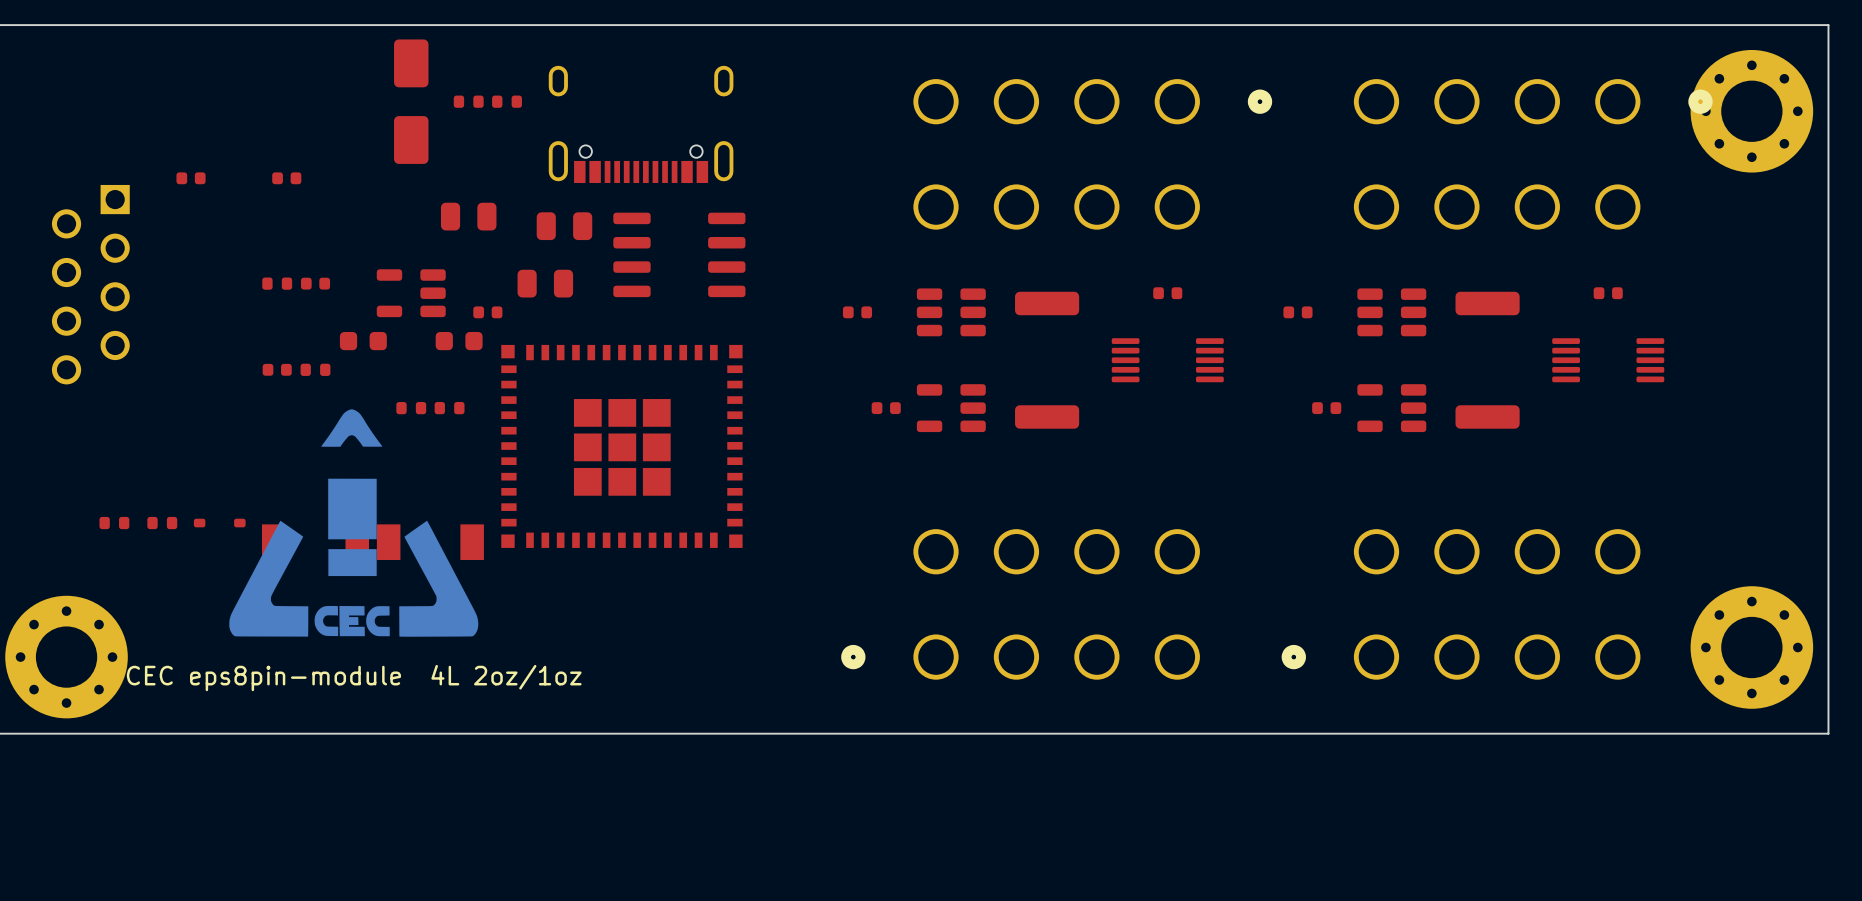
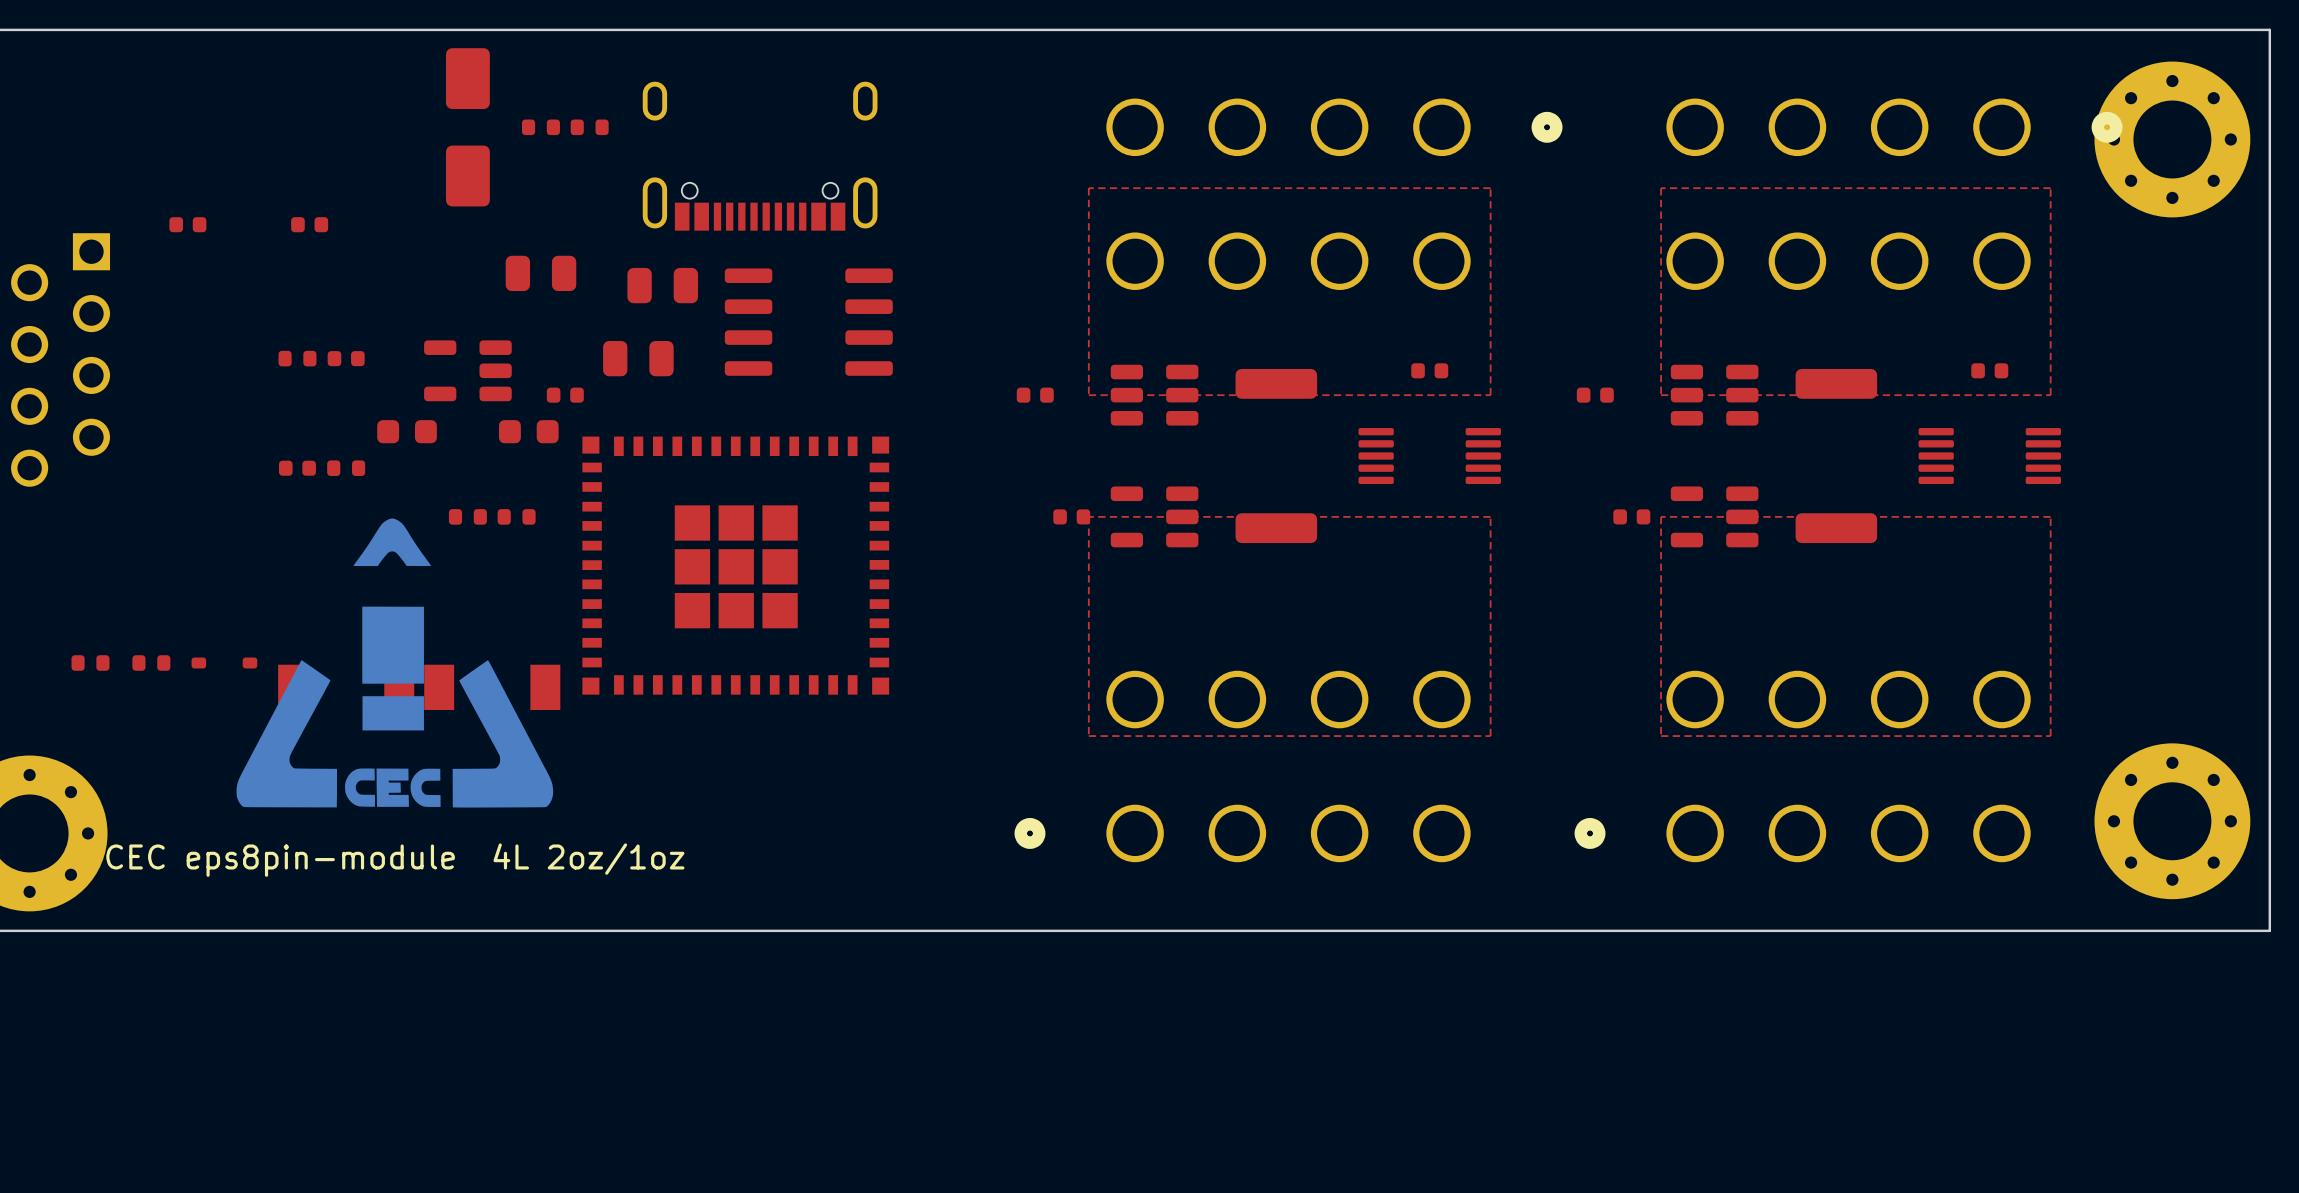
top zone outline: none -> (1490, 188) (1490, 395) (1088, 395) (1088, 188) (1490, 188)
top zone outline: none -> (2050, 188) (2050, 395) (1661, 395) (1661, 188) (2050, 188)
top zone outline: none -> (1490, 516) (1088, 516) (1088, 736) (1490, 736) (1490, 516)
top zone outline: none -> (2050, 516) (1661, 516) (1661, 736) (2050, 736) (2050, 516)

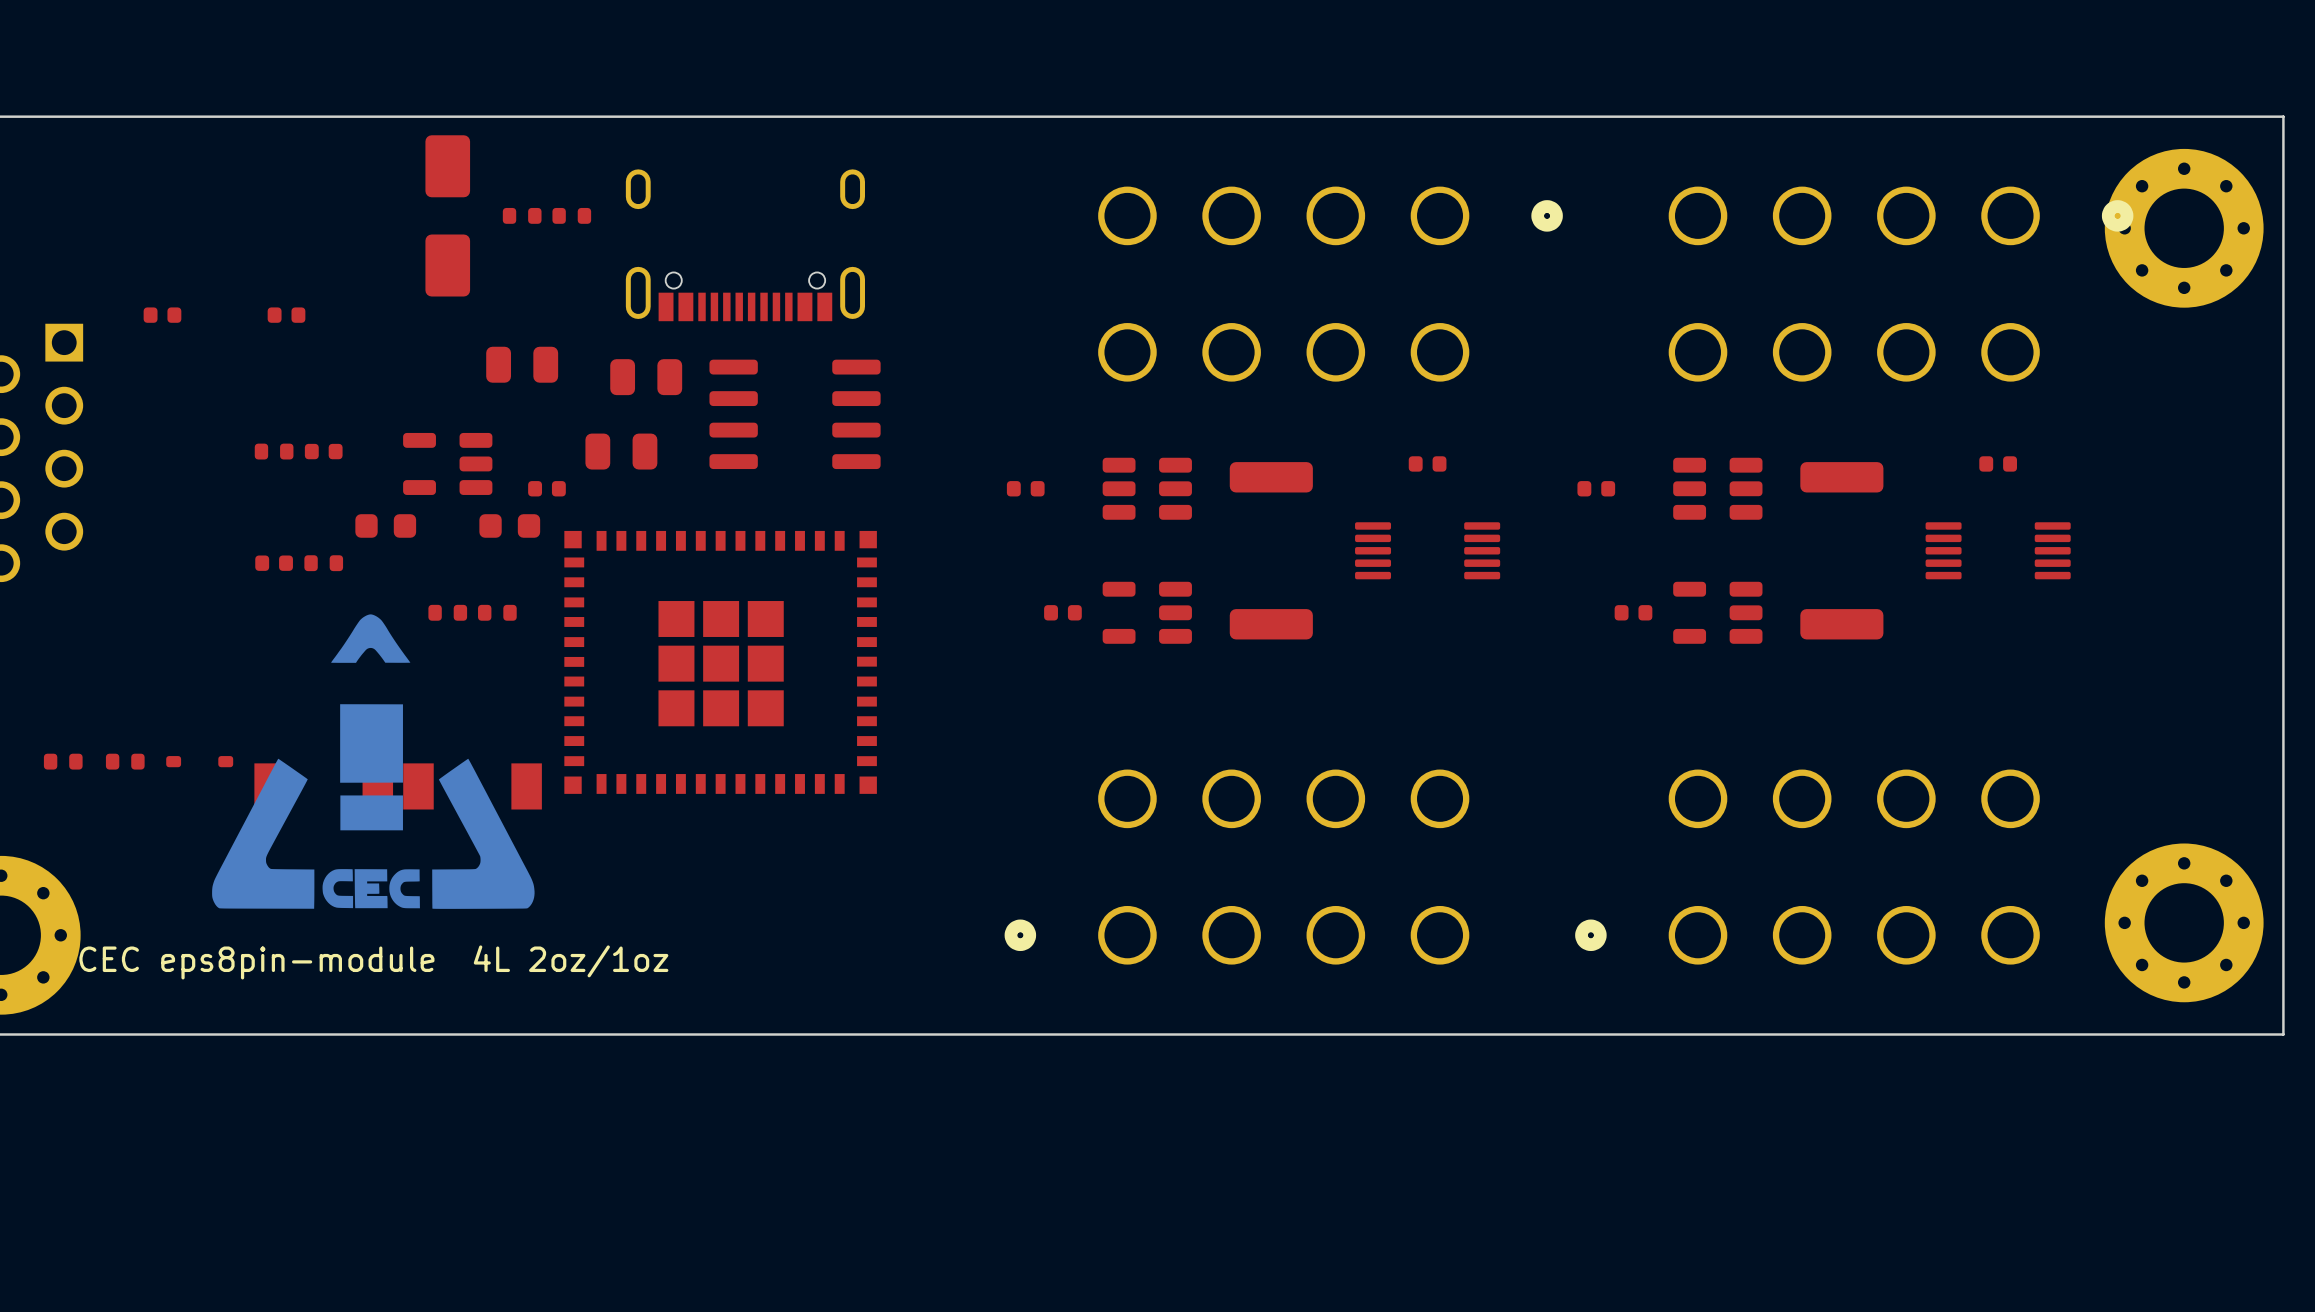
top zone outline: (1490, 188) (1490, 395) (1088, 395) (1088, 188) (1490, 188) -> none
top zone outline: (2050, 188) (2050, 395) (1661, 395) (1661, 188) (2050, 188) -> none
top zone outline: (1490, 516) (1088, 516) (1088, 736) (1490, 736) (1490, 516) -> none
top zone outline: (2050, 516) (1661, 516) (1661, 736) (2050, 736) (2050, 516) -> none

